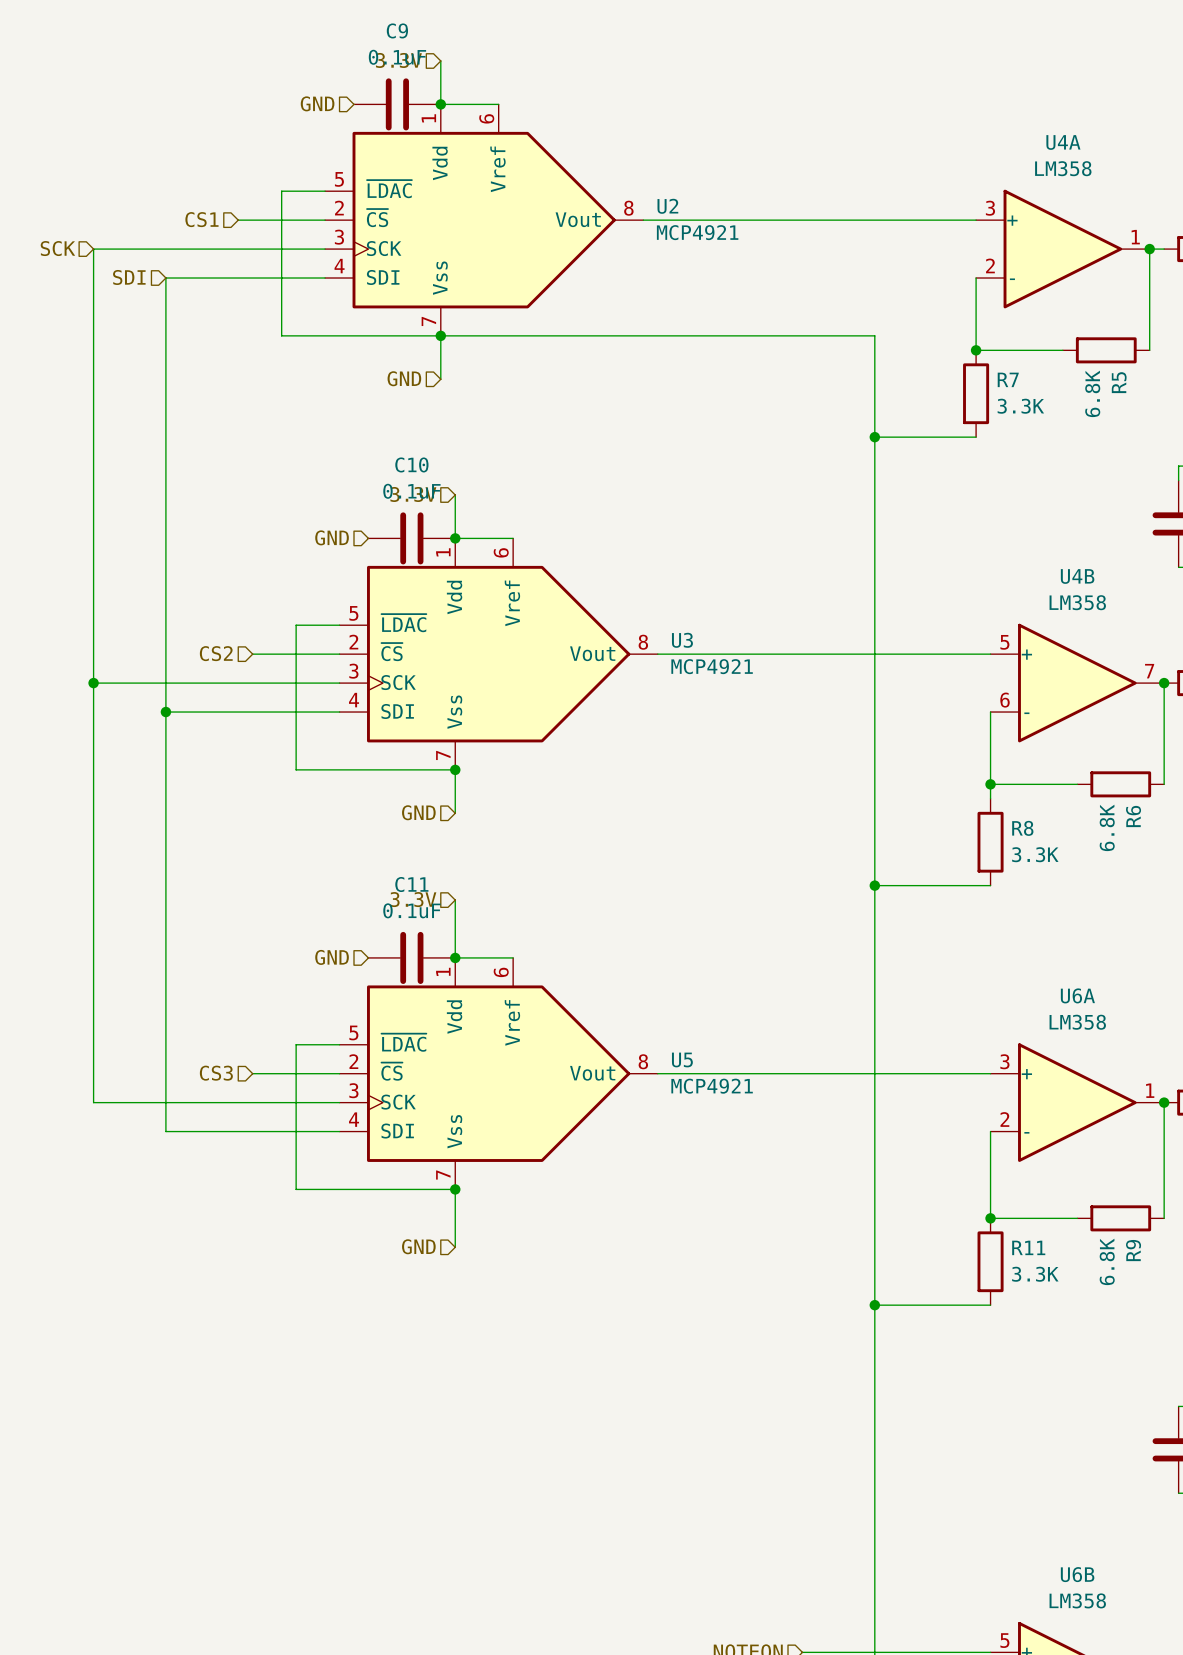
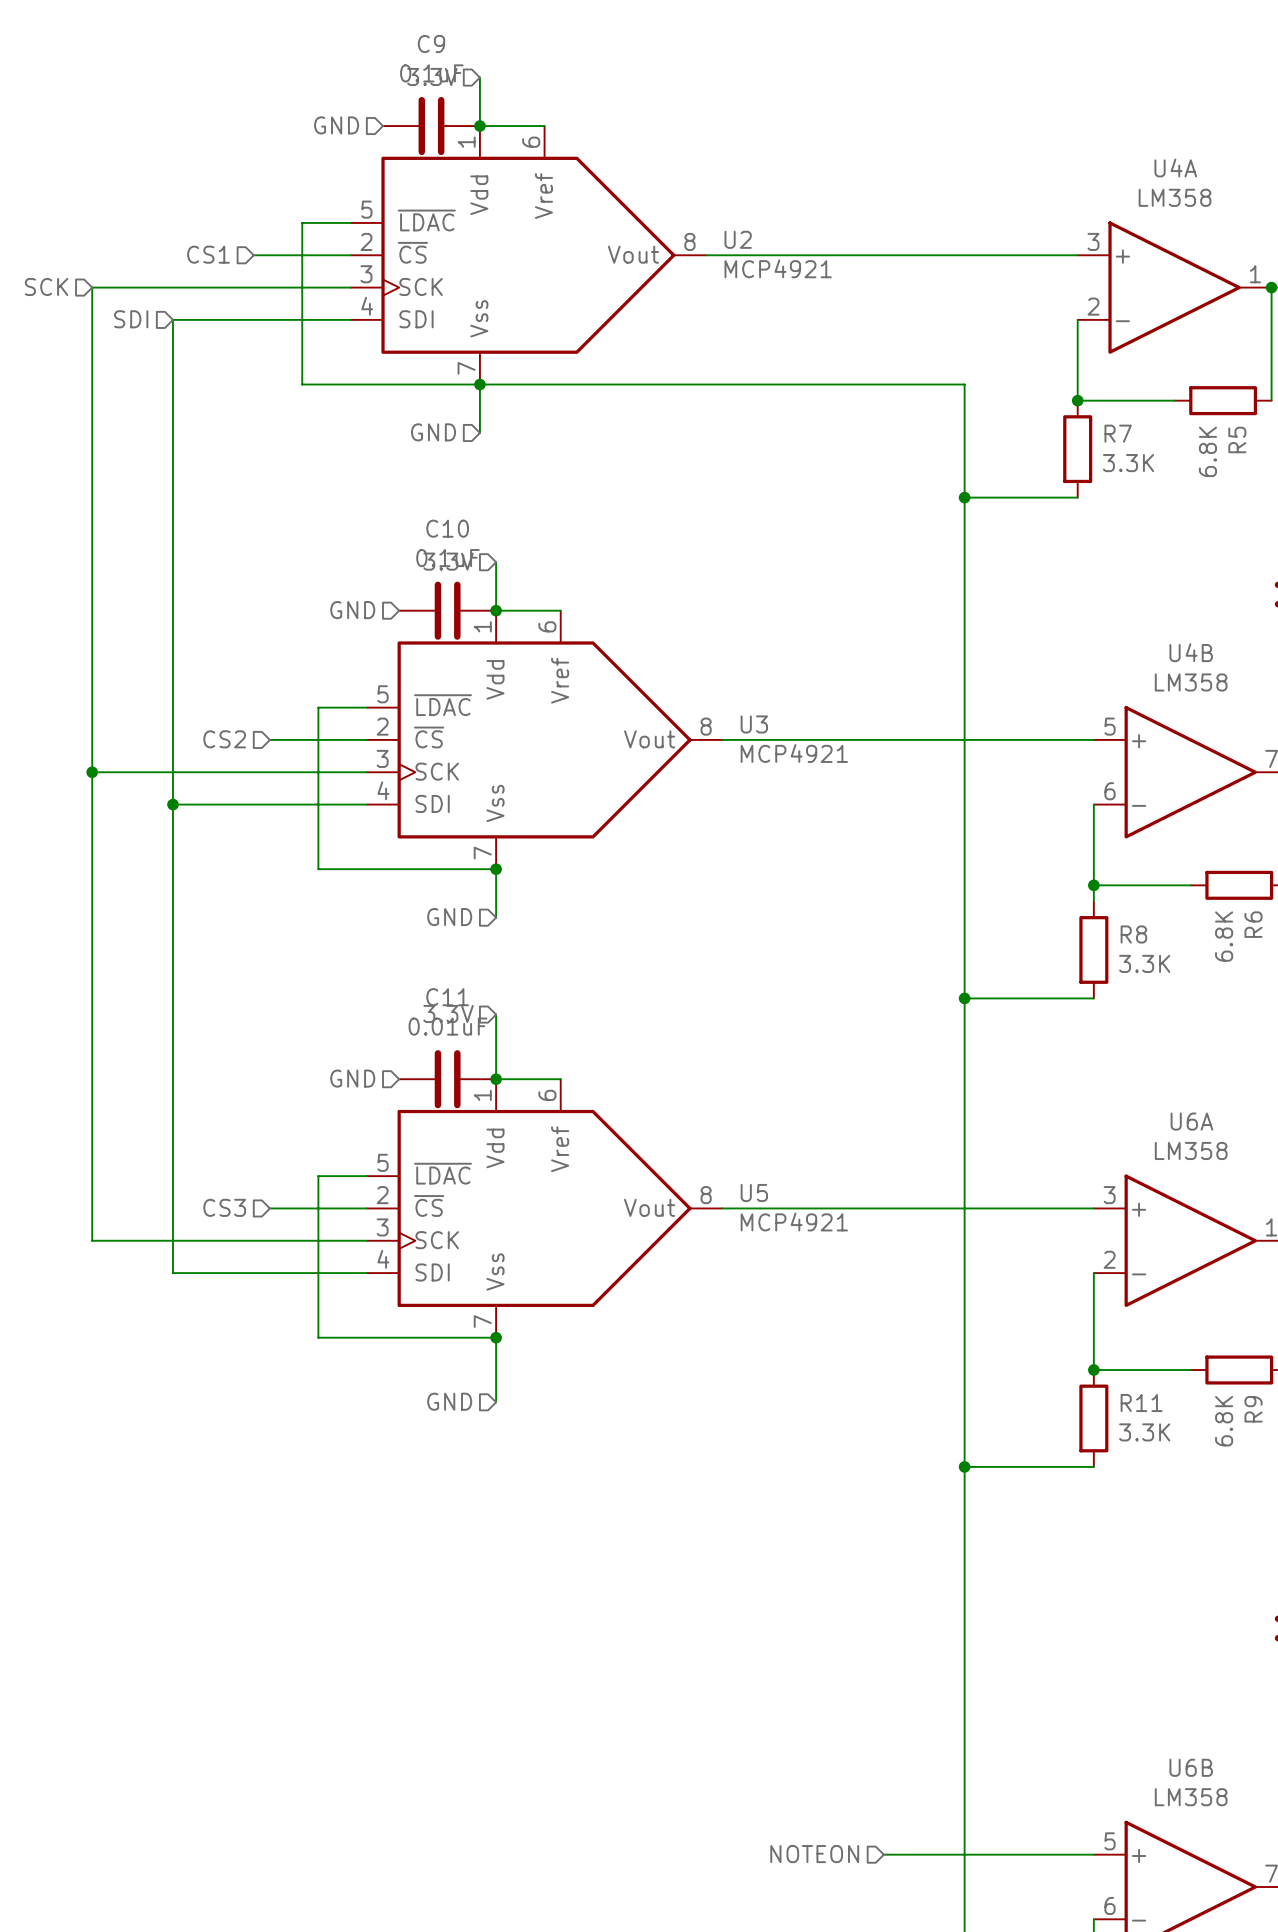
C11 value: 0.1uF (411, 910) -> 0.01uF (448, 1026)

